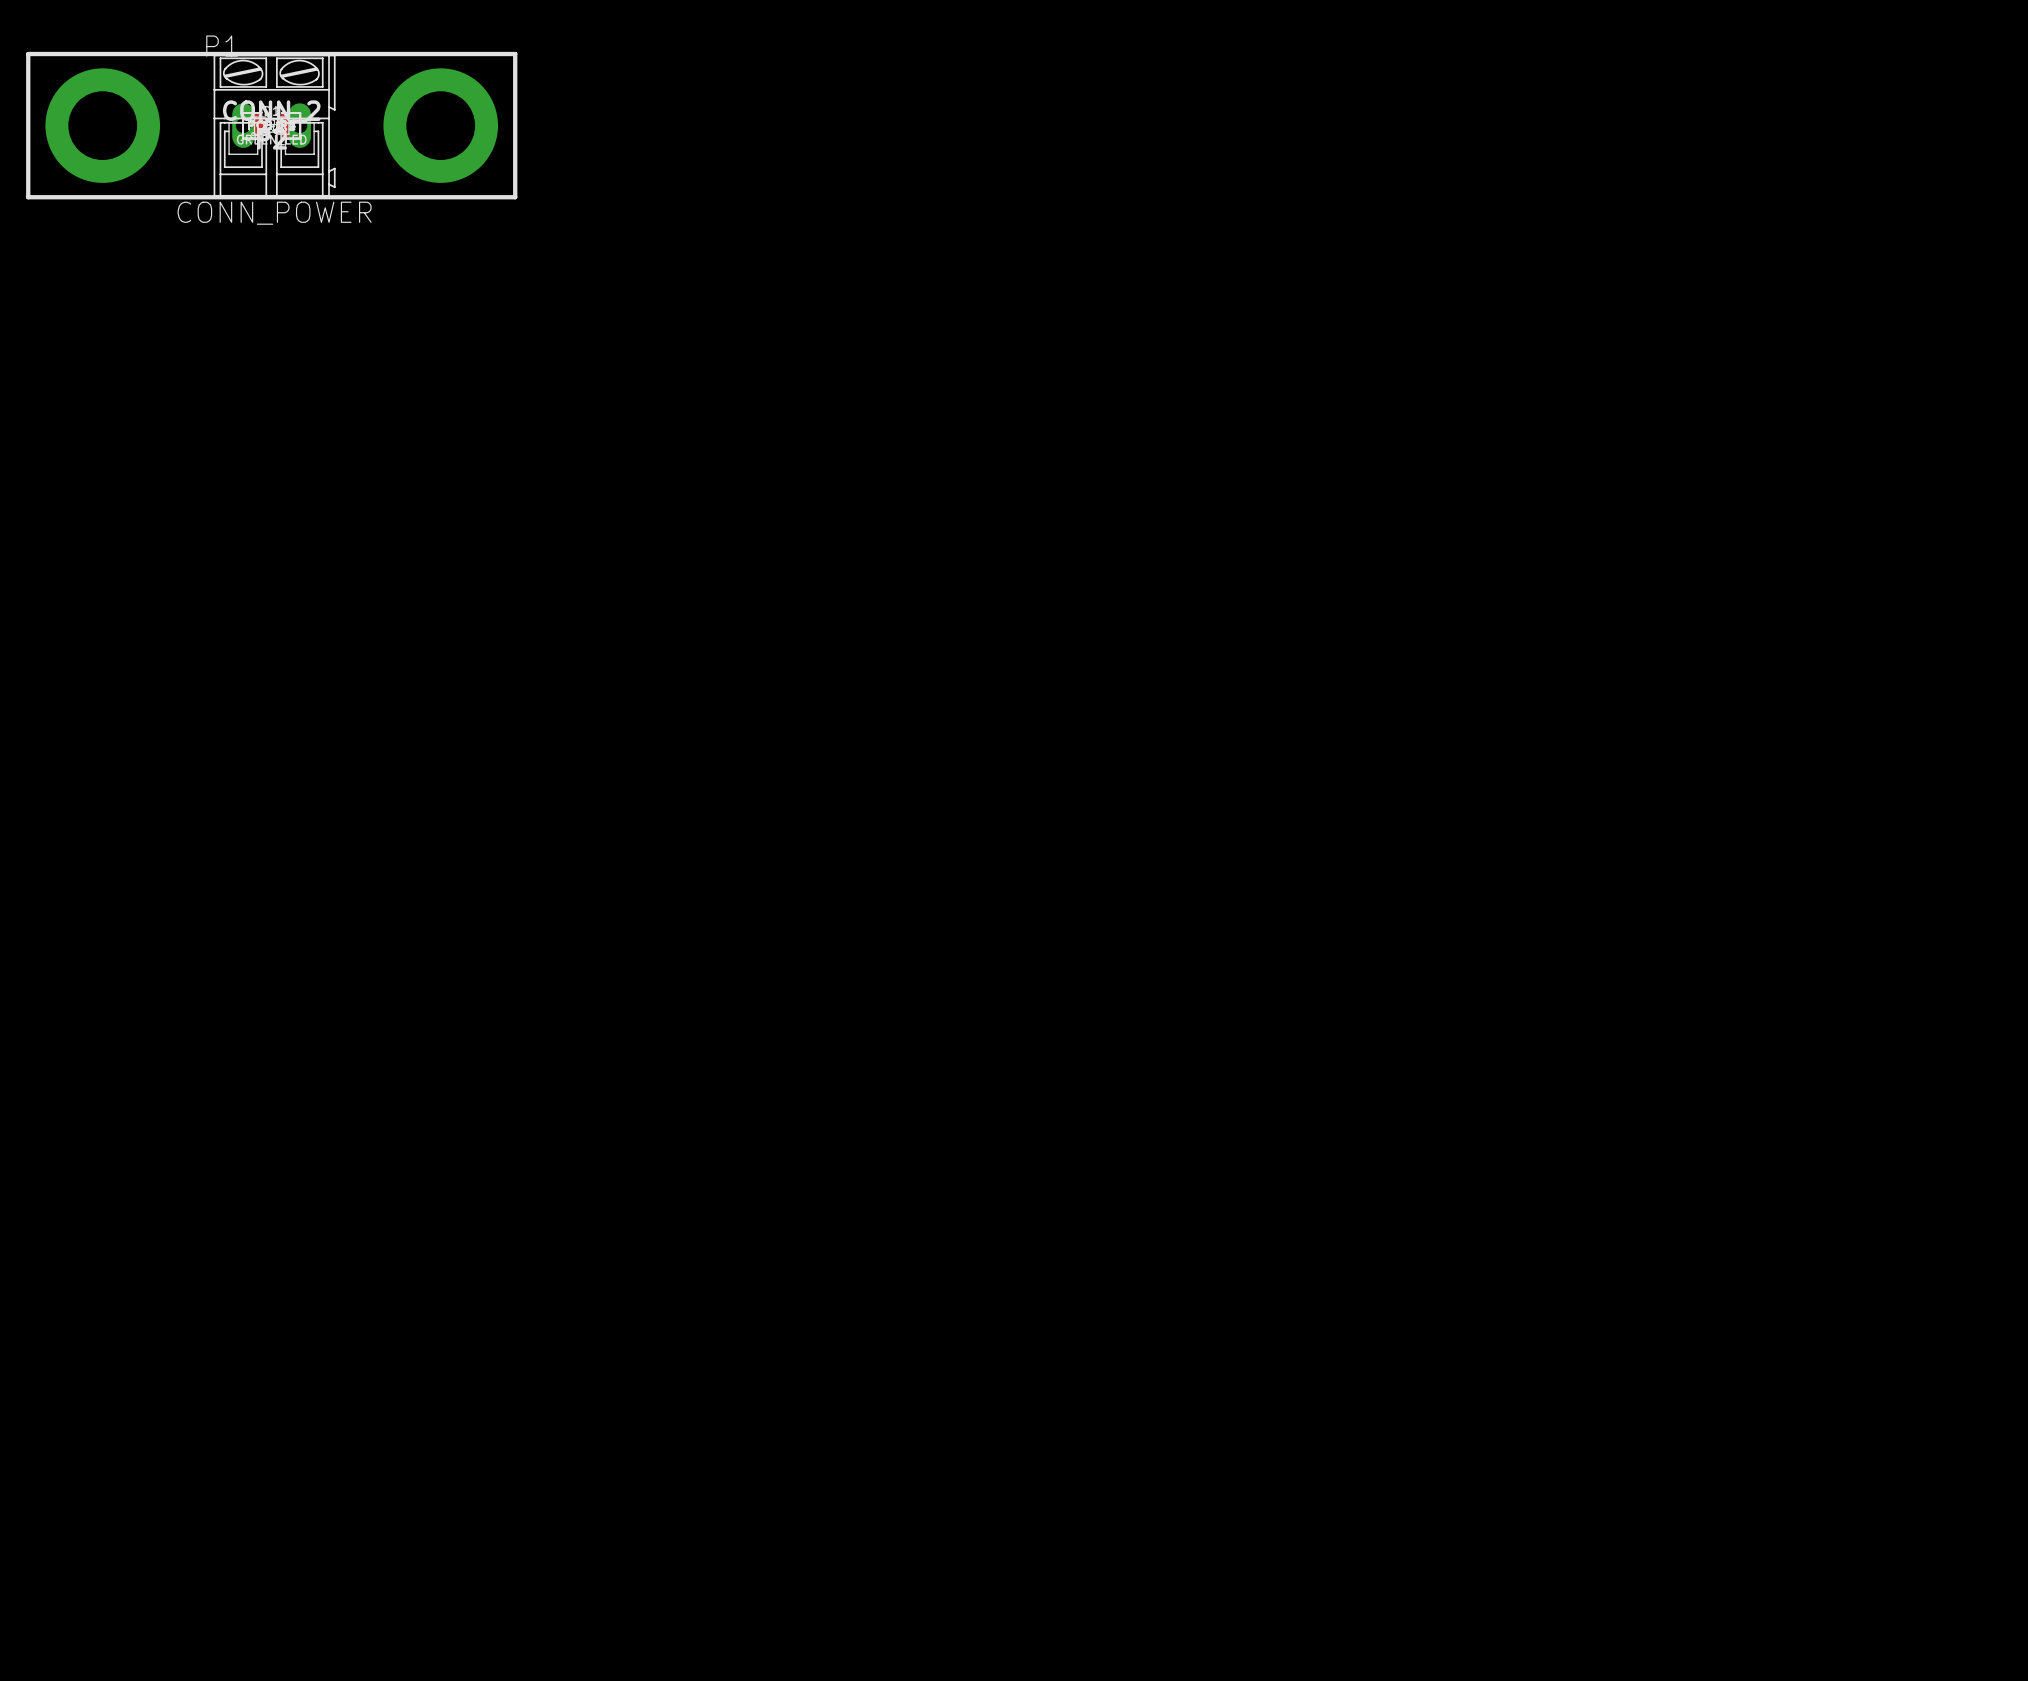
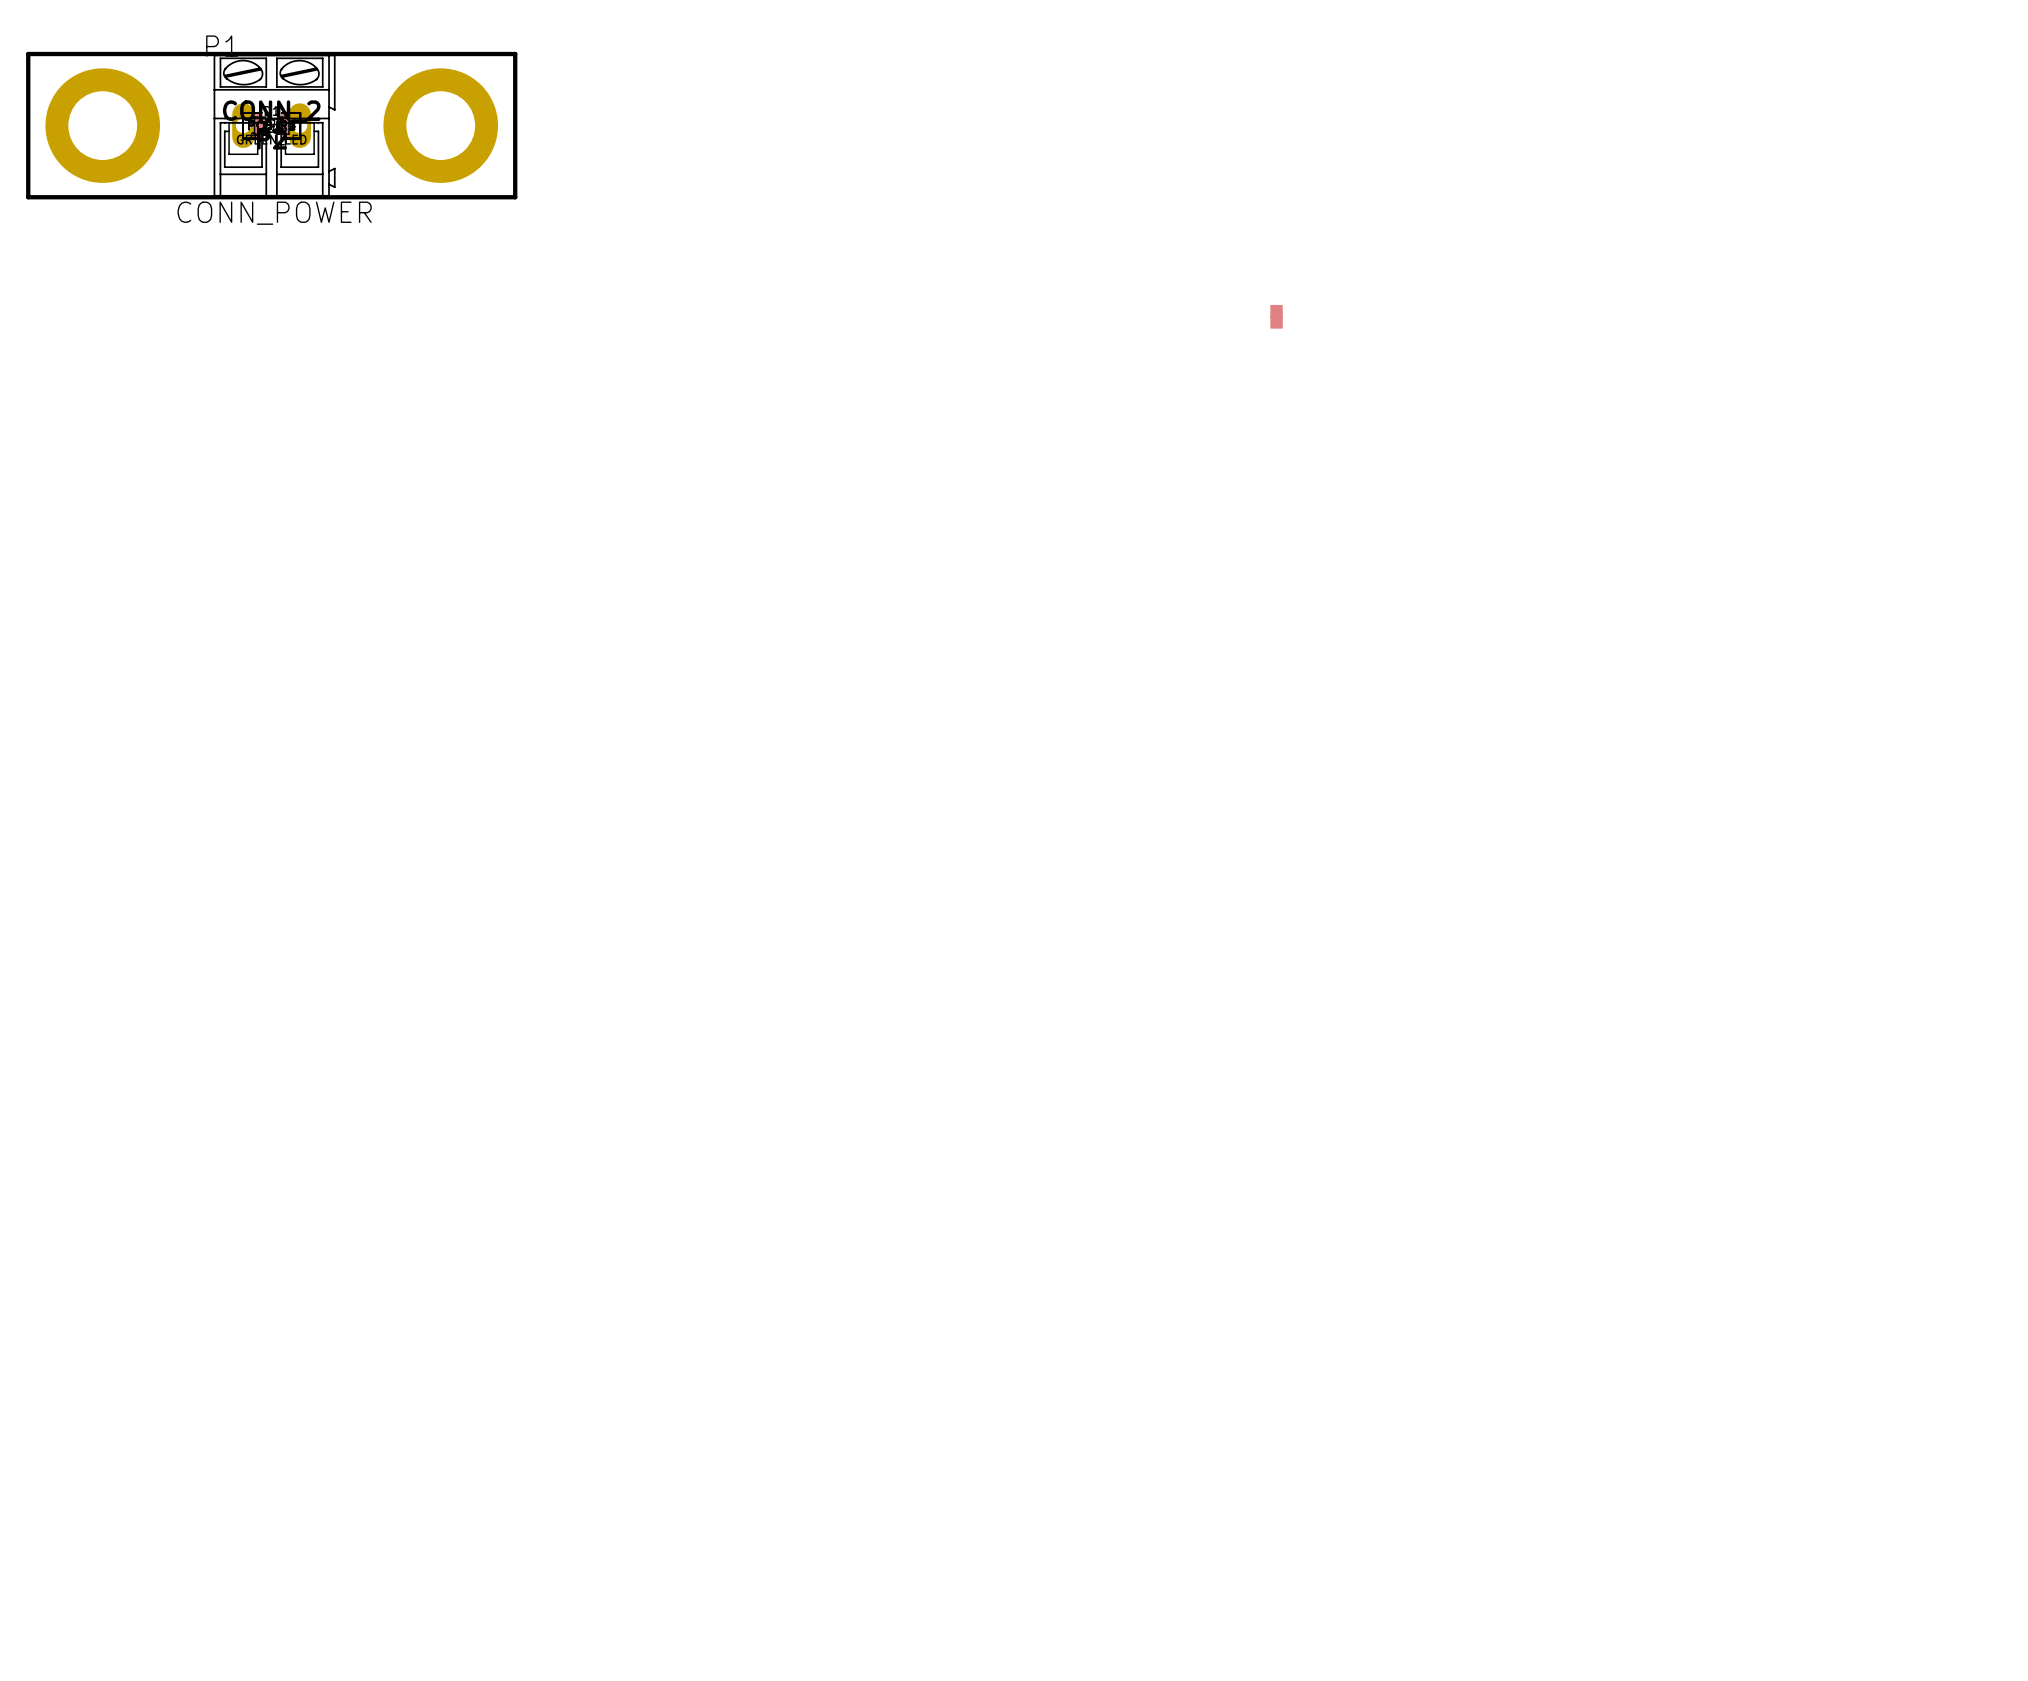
part: none -> (1276, 316)

